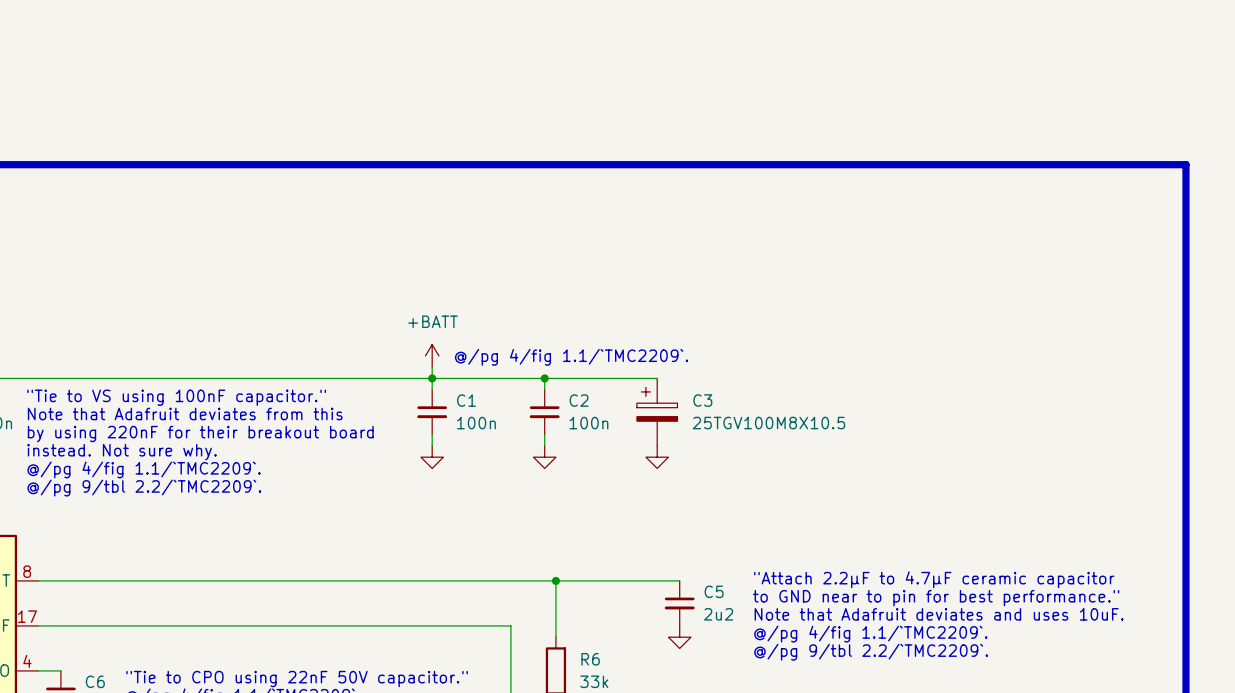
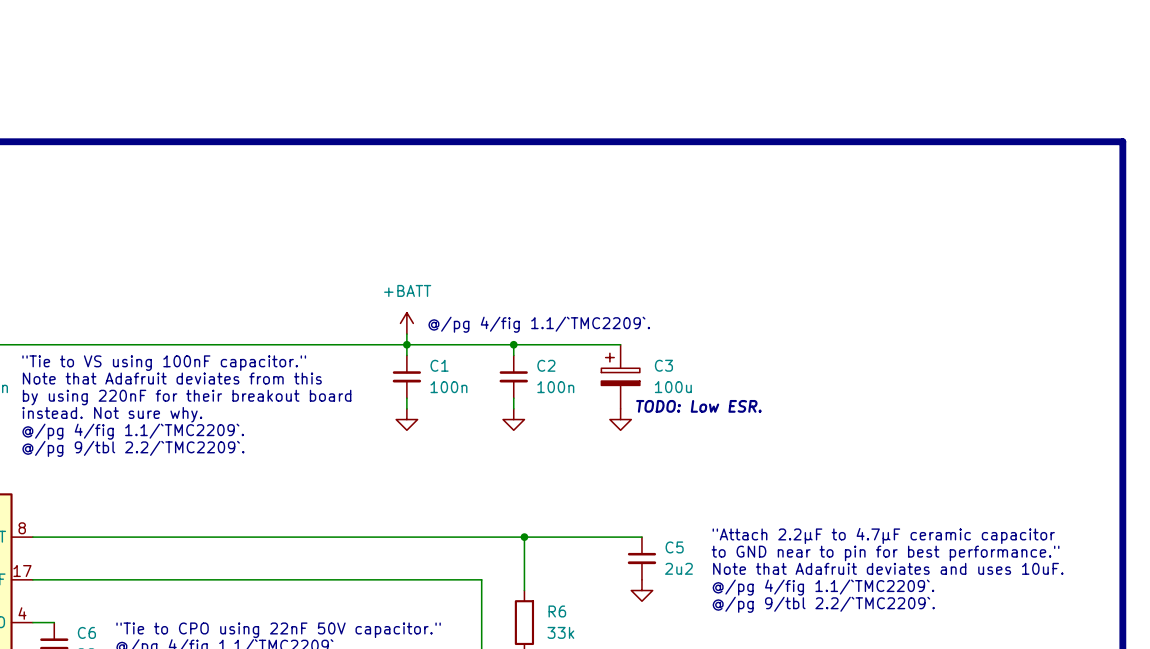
C3 value: 25TGV100M8X10.5 (768, 423) -> 100u (673, 387)
text: none -> TODO: Low ESR. (698, 406)

